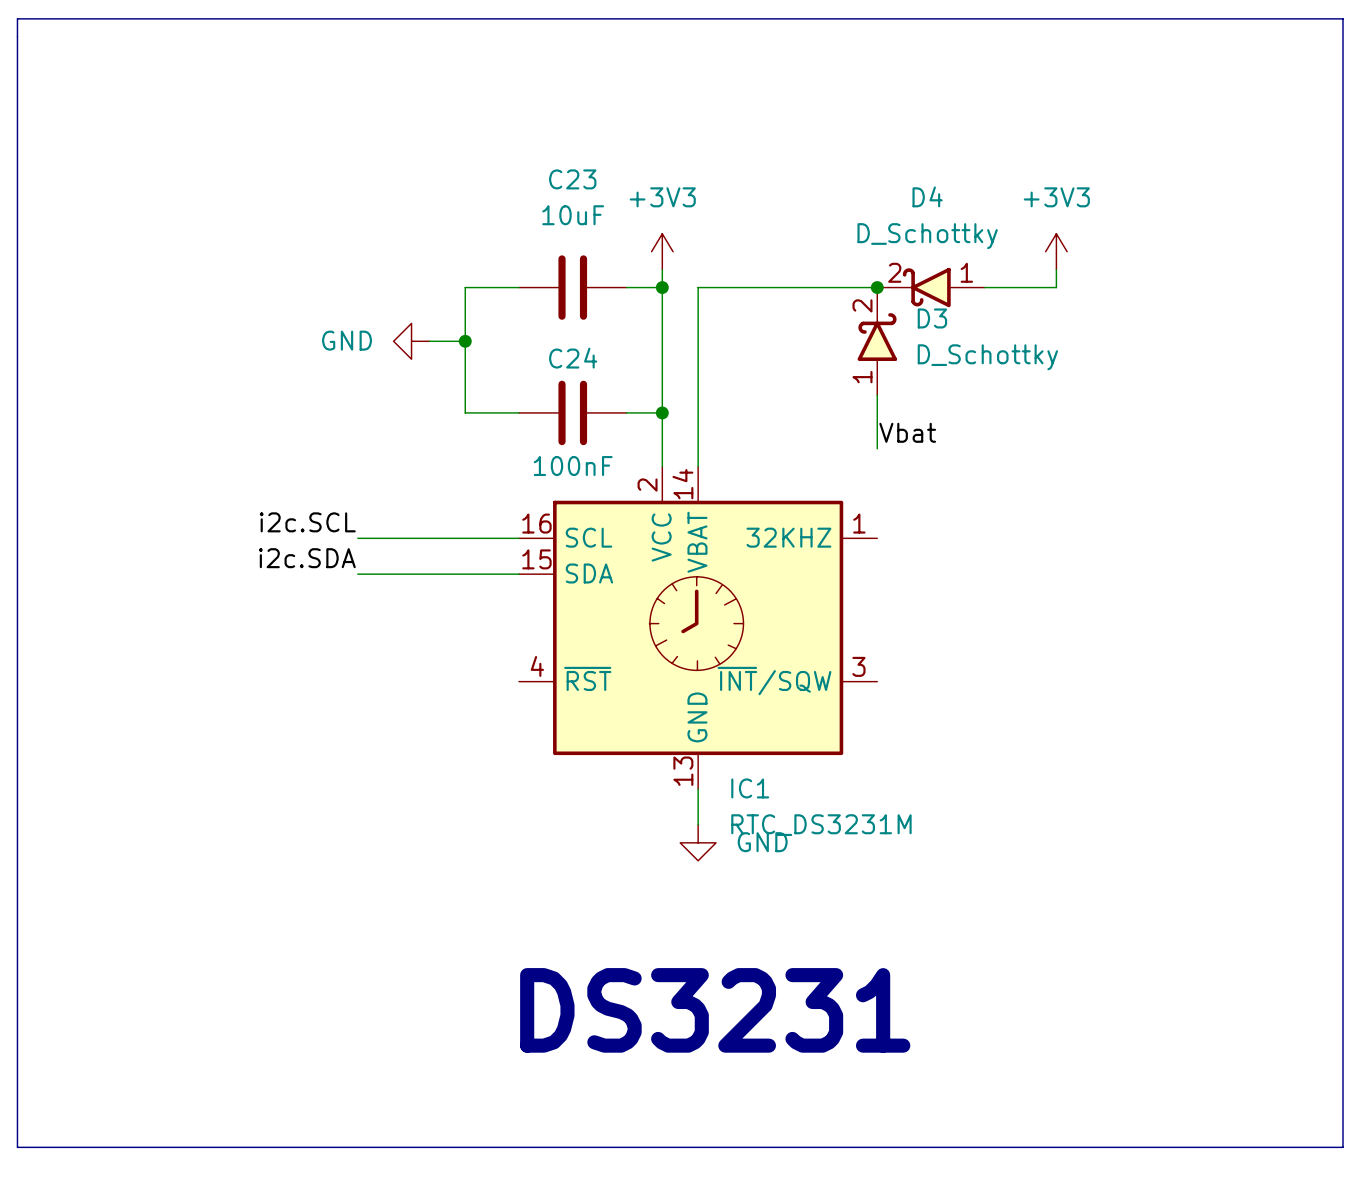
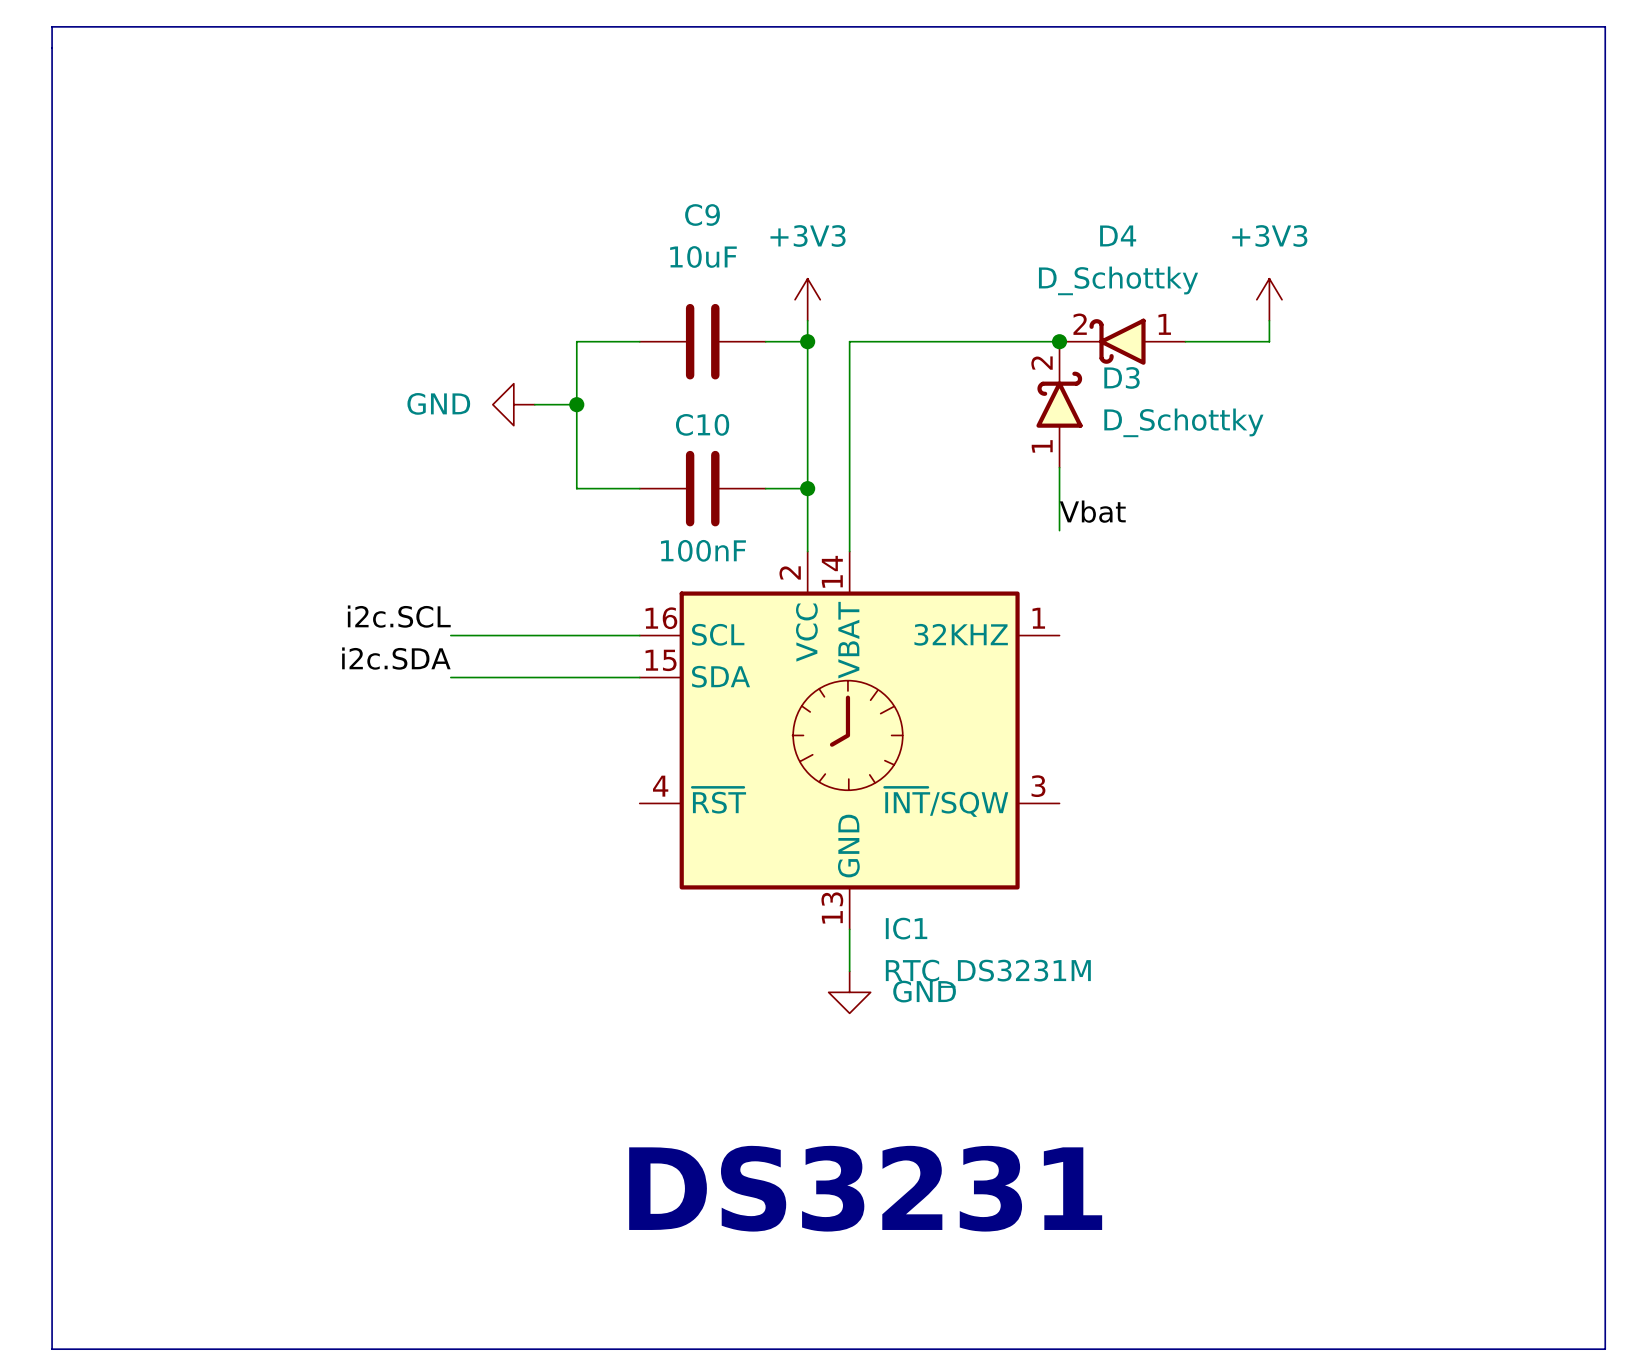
C23 name: C23 (572, 179) -> C9 (702, 215)
C24 name: C24 (573, 358) -> C10 (702, 424)

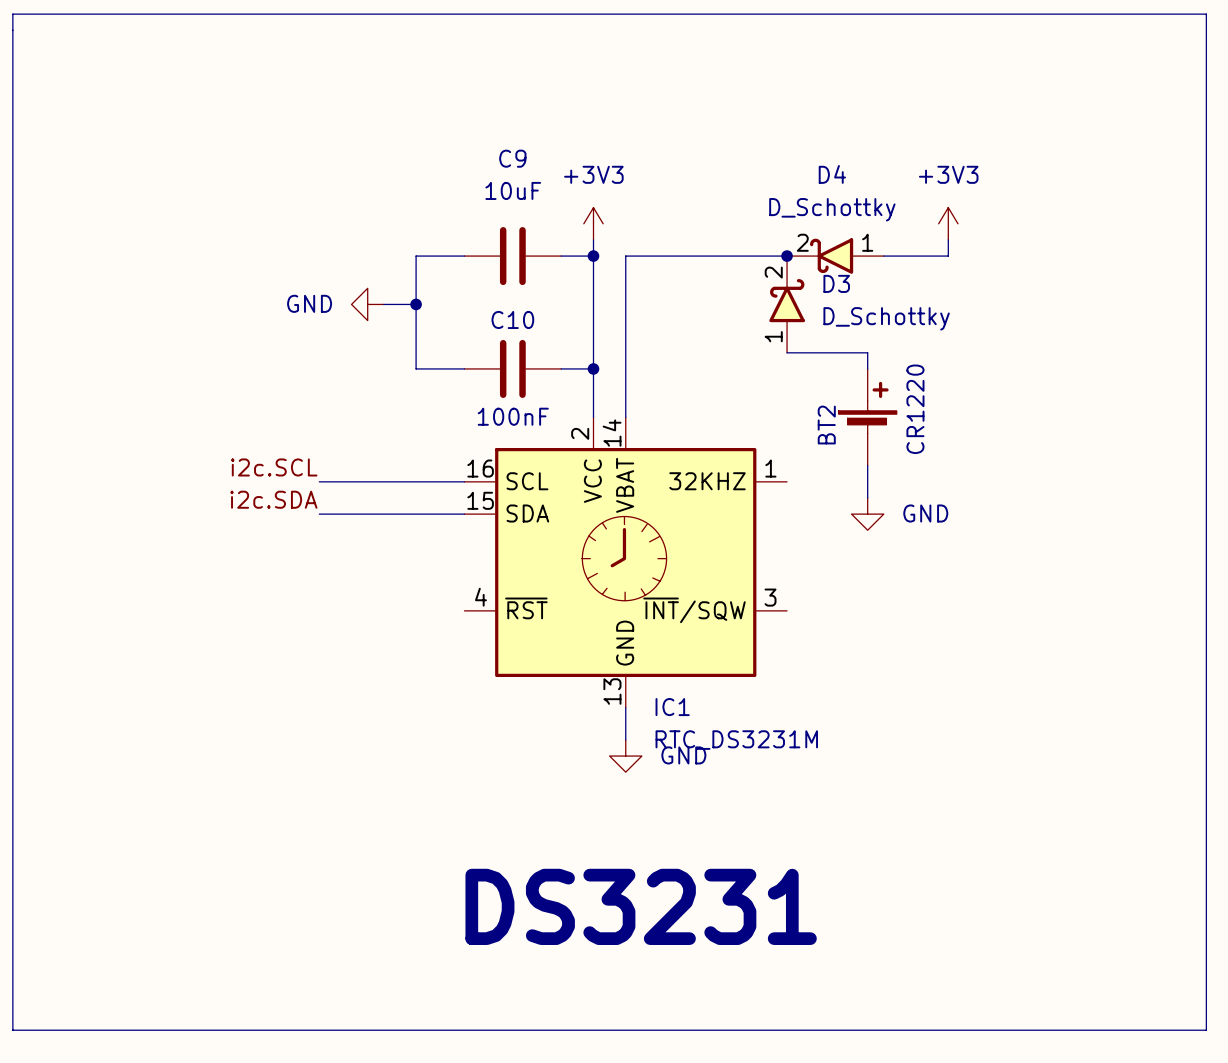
wire: (1059, 467) (1059, 530) -> (787, 352) (867, 352) (867, 368)
label: Vbat (1092, 511) -> none
BT2: none -> CR1220 (867, 417)
wire: none -> (867, 465) (867, 497)
power symbol: none -> GND (867, 514)

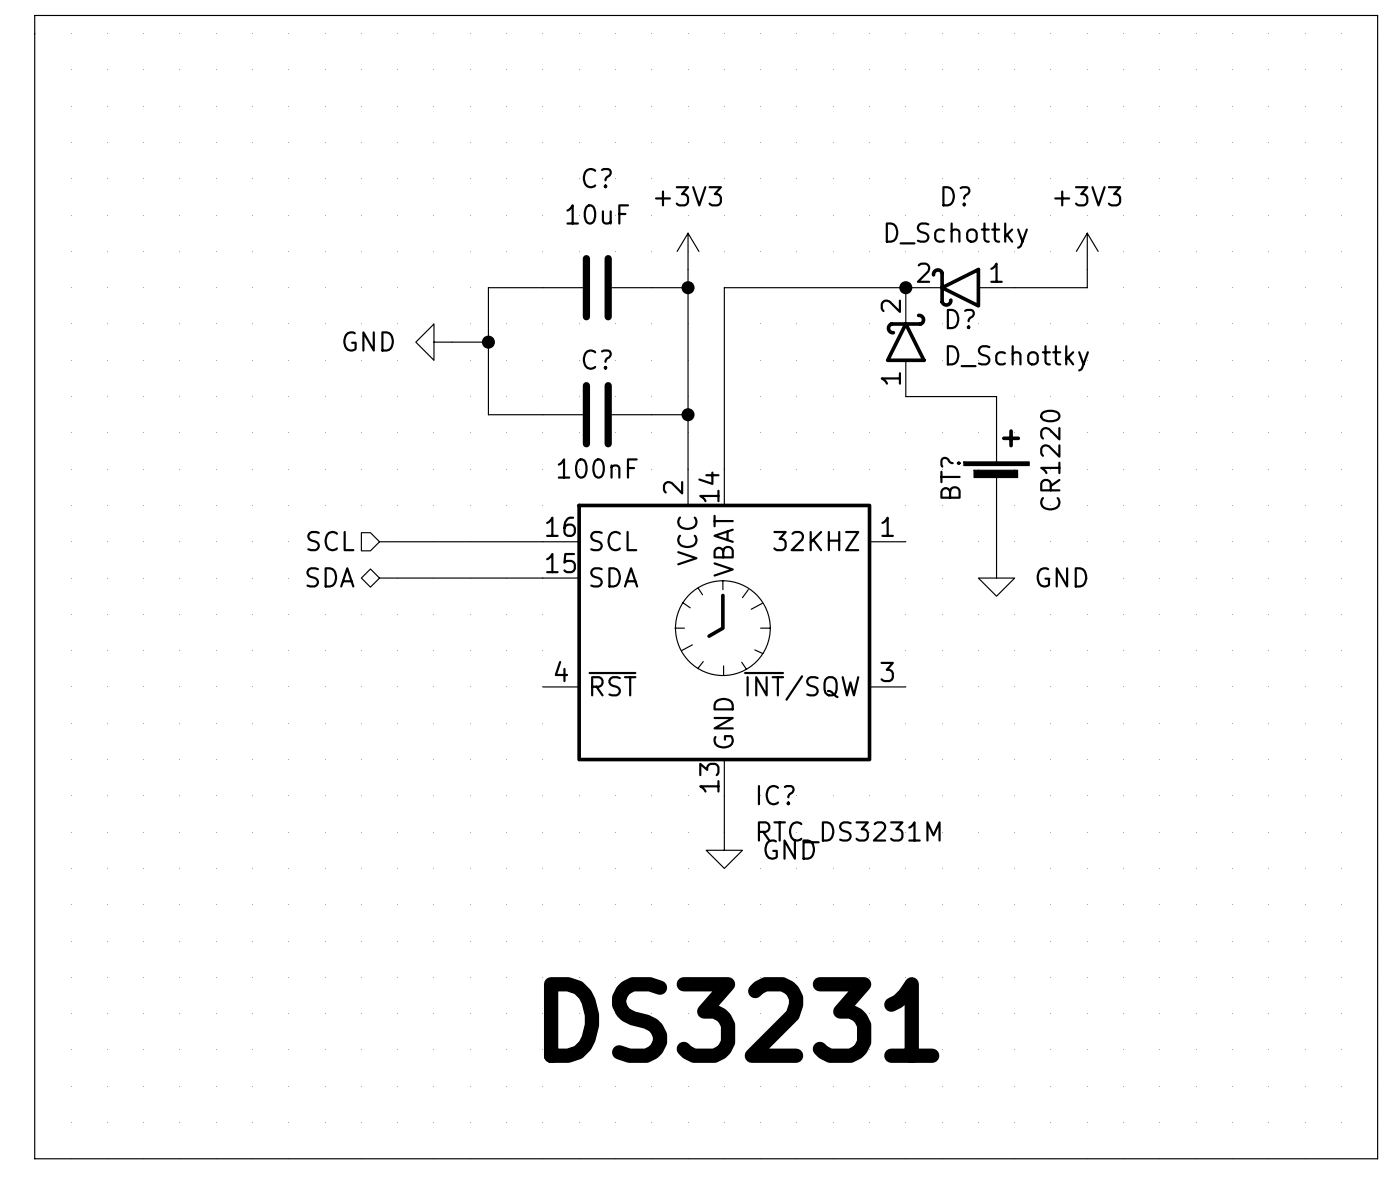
C9 name: C9 (512, 158) -> C? (597, 178)
D4 name: D4 (832, 174) -> D? (956, 196)
D3 name: D3 (836, 283) -> D? (960, 319)
C10 name: C10 (512, 319) -> C? (597, 359)
BT2 name: BT2 (826, 425) -> BT? (950, 477)
label: i2c.SCL (274, 467) -> none
hierarchical label: none -> SCL (330, 541)
label: i2c.SDA (273, 499) -> none
hierarchical label: none -> SDA (330, 577)
IC1 name: IC1 (672, 707) -> IC? (776, 795)

